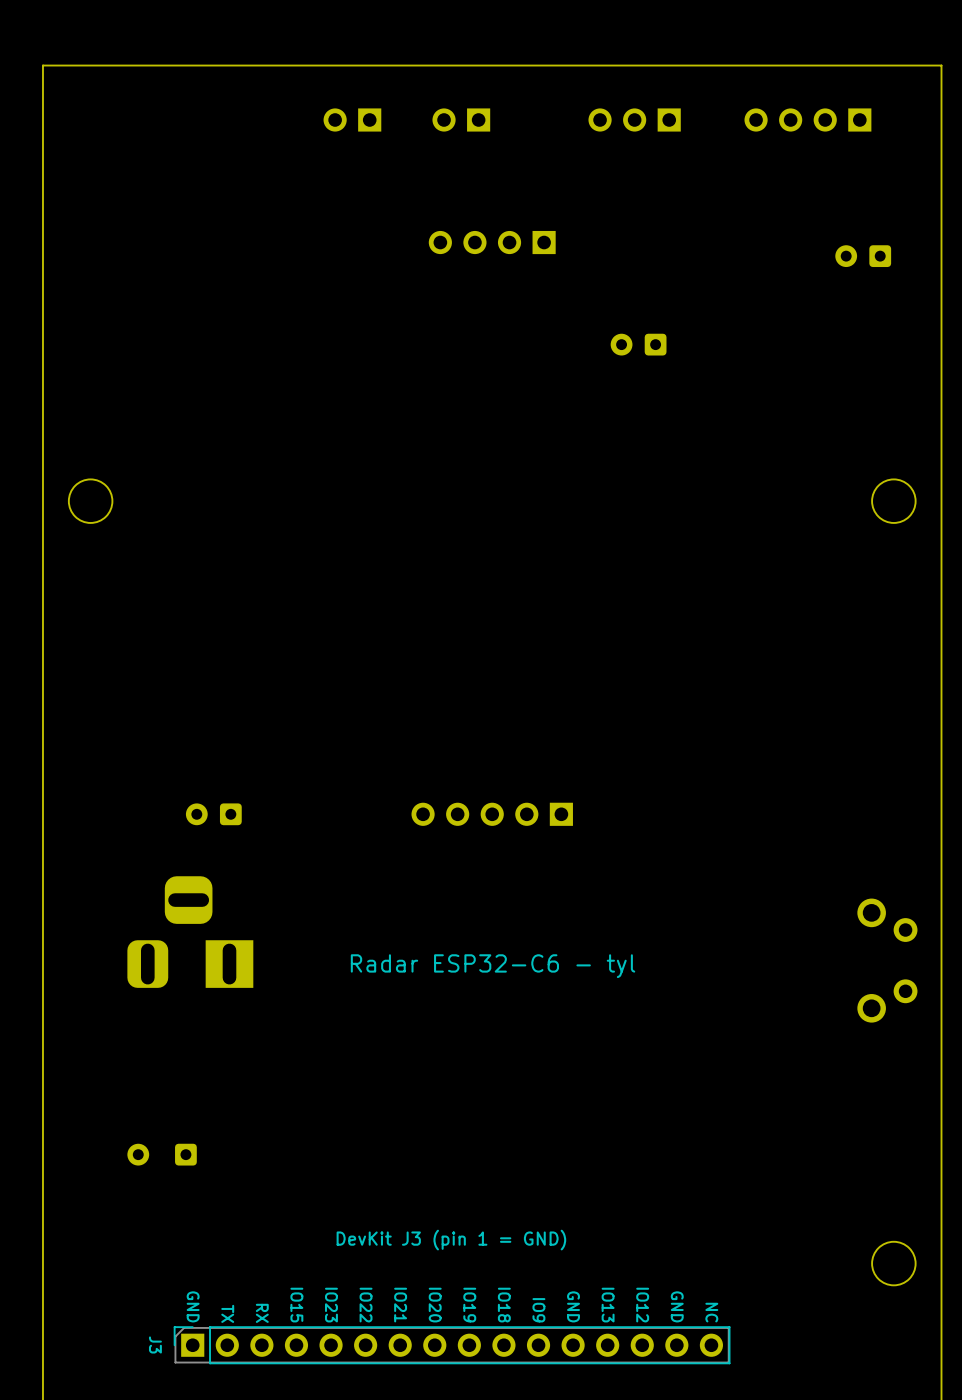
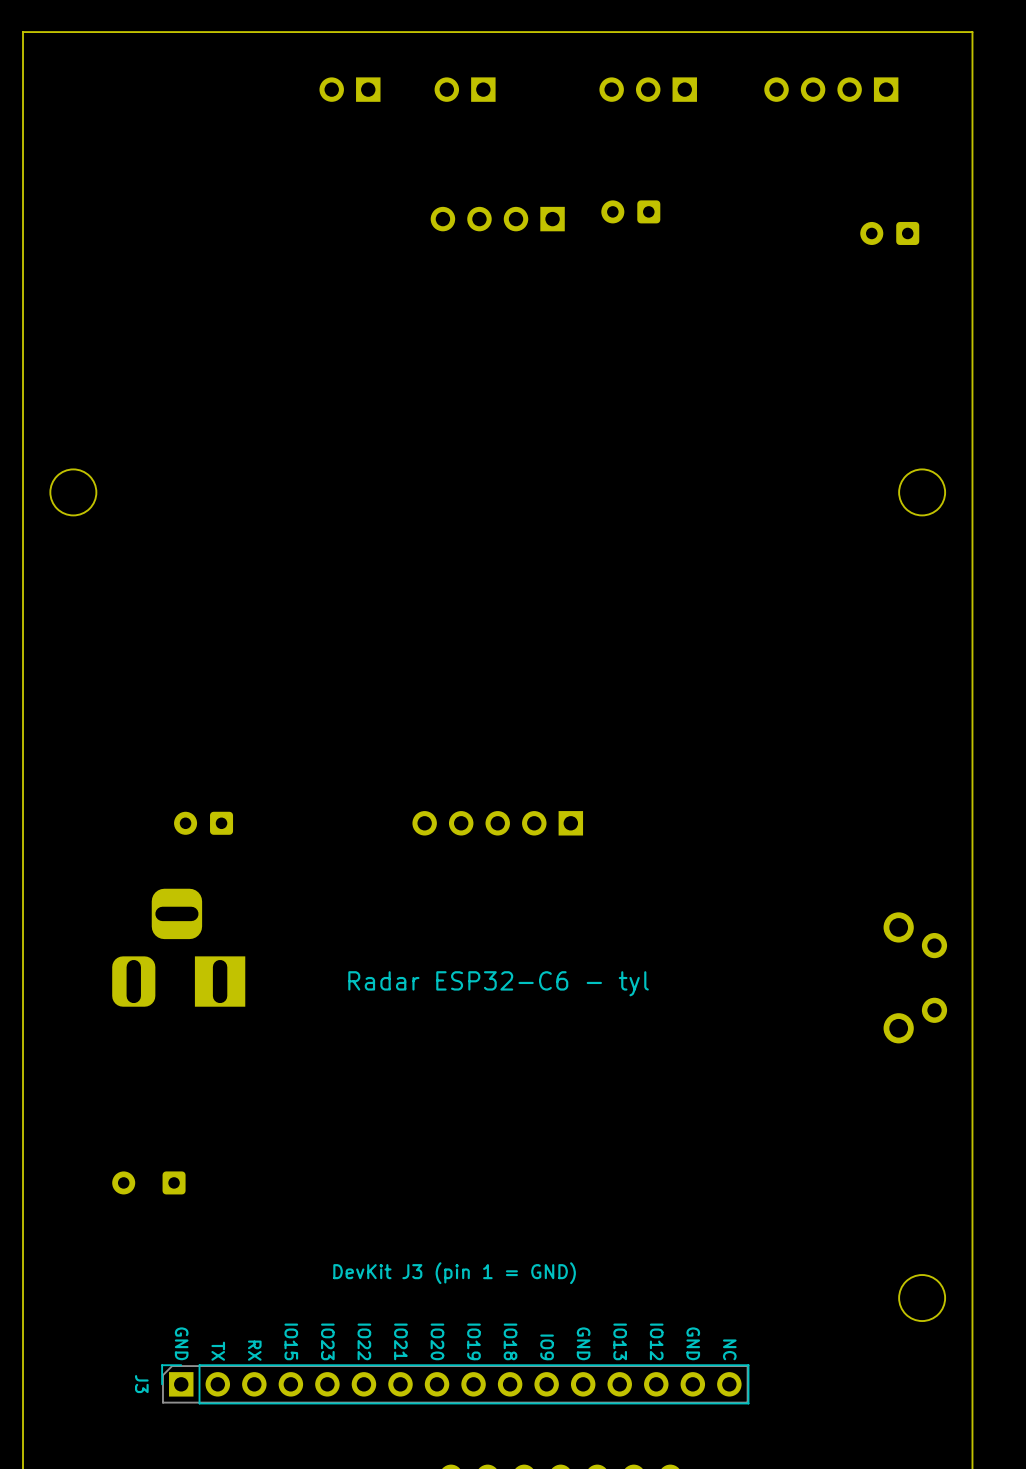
part position: (638, 344) -> (630, 211)

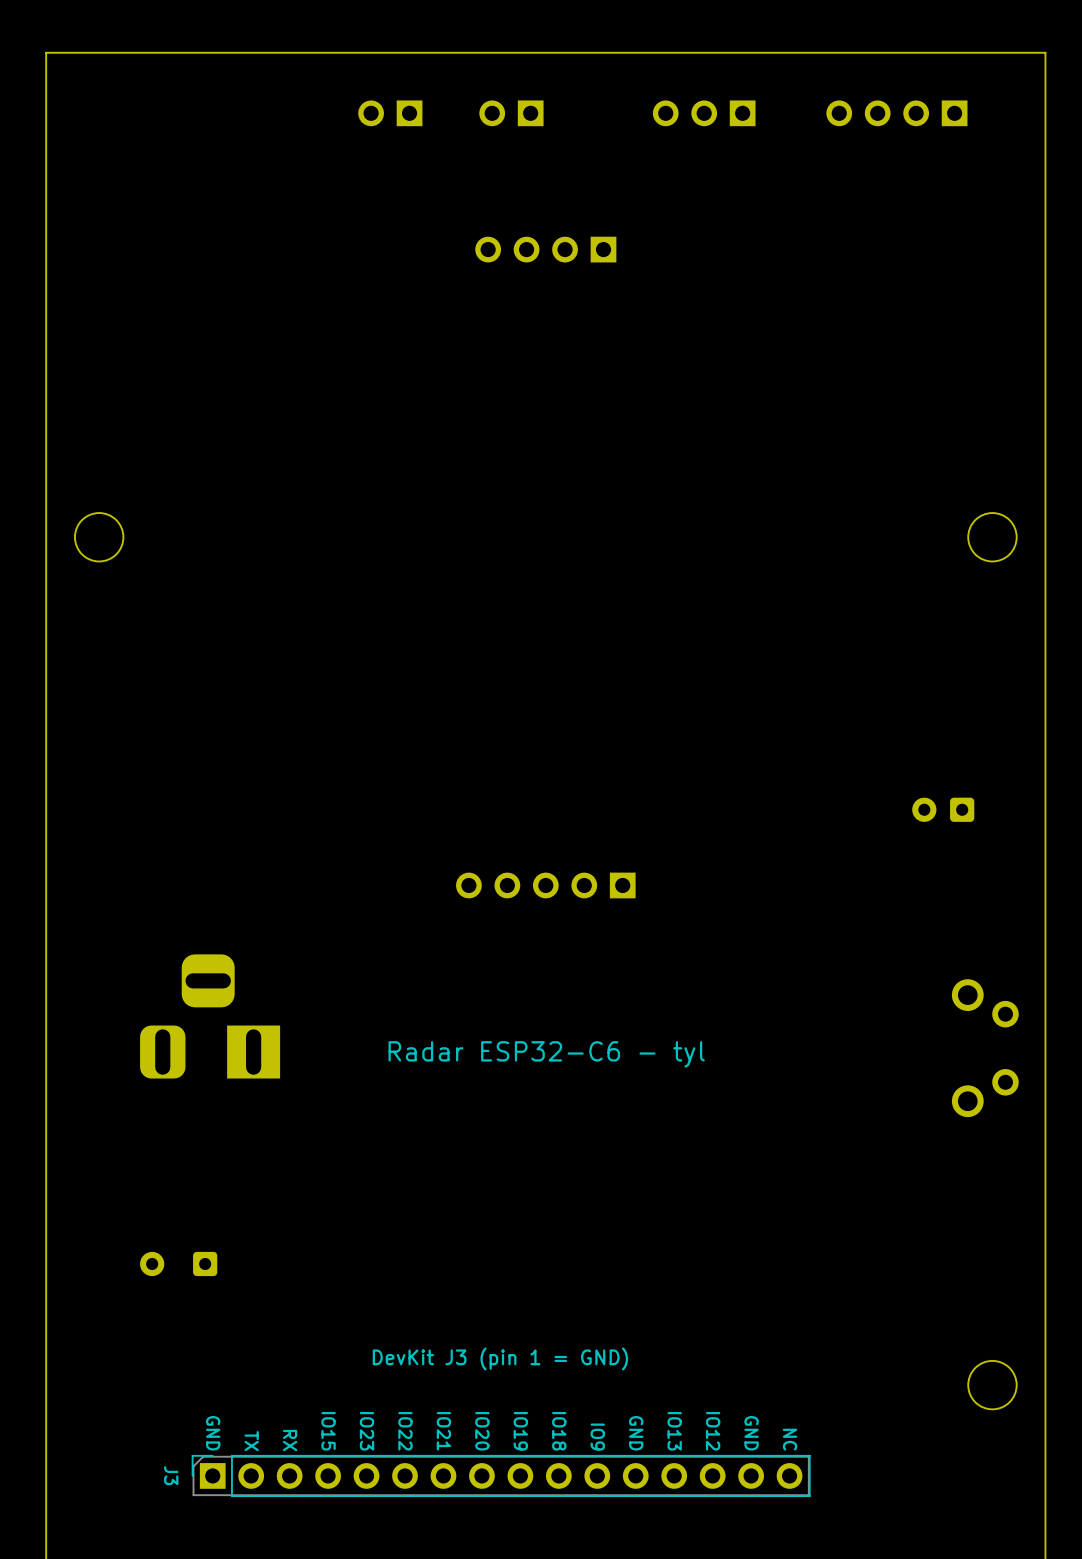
part: (630, 211) -> none
part: (889, 233) -> none
part: none -> (943, 809)
part: (203, 823) -> none

